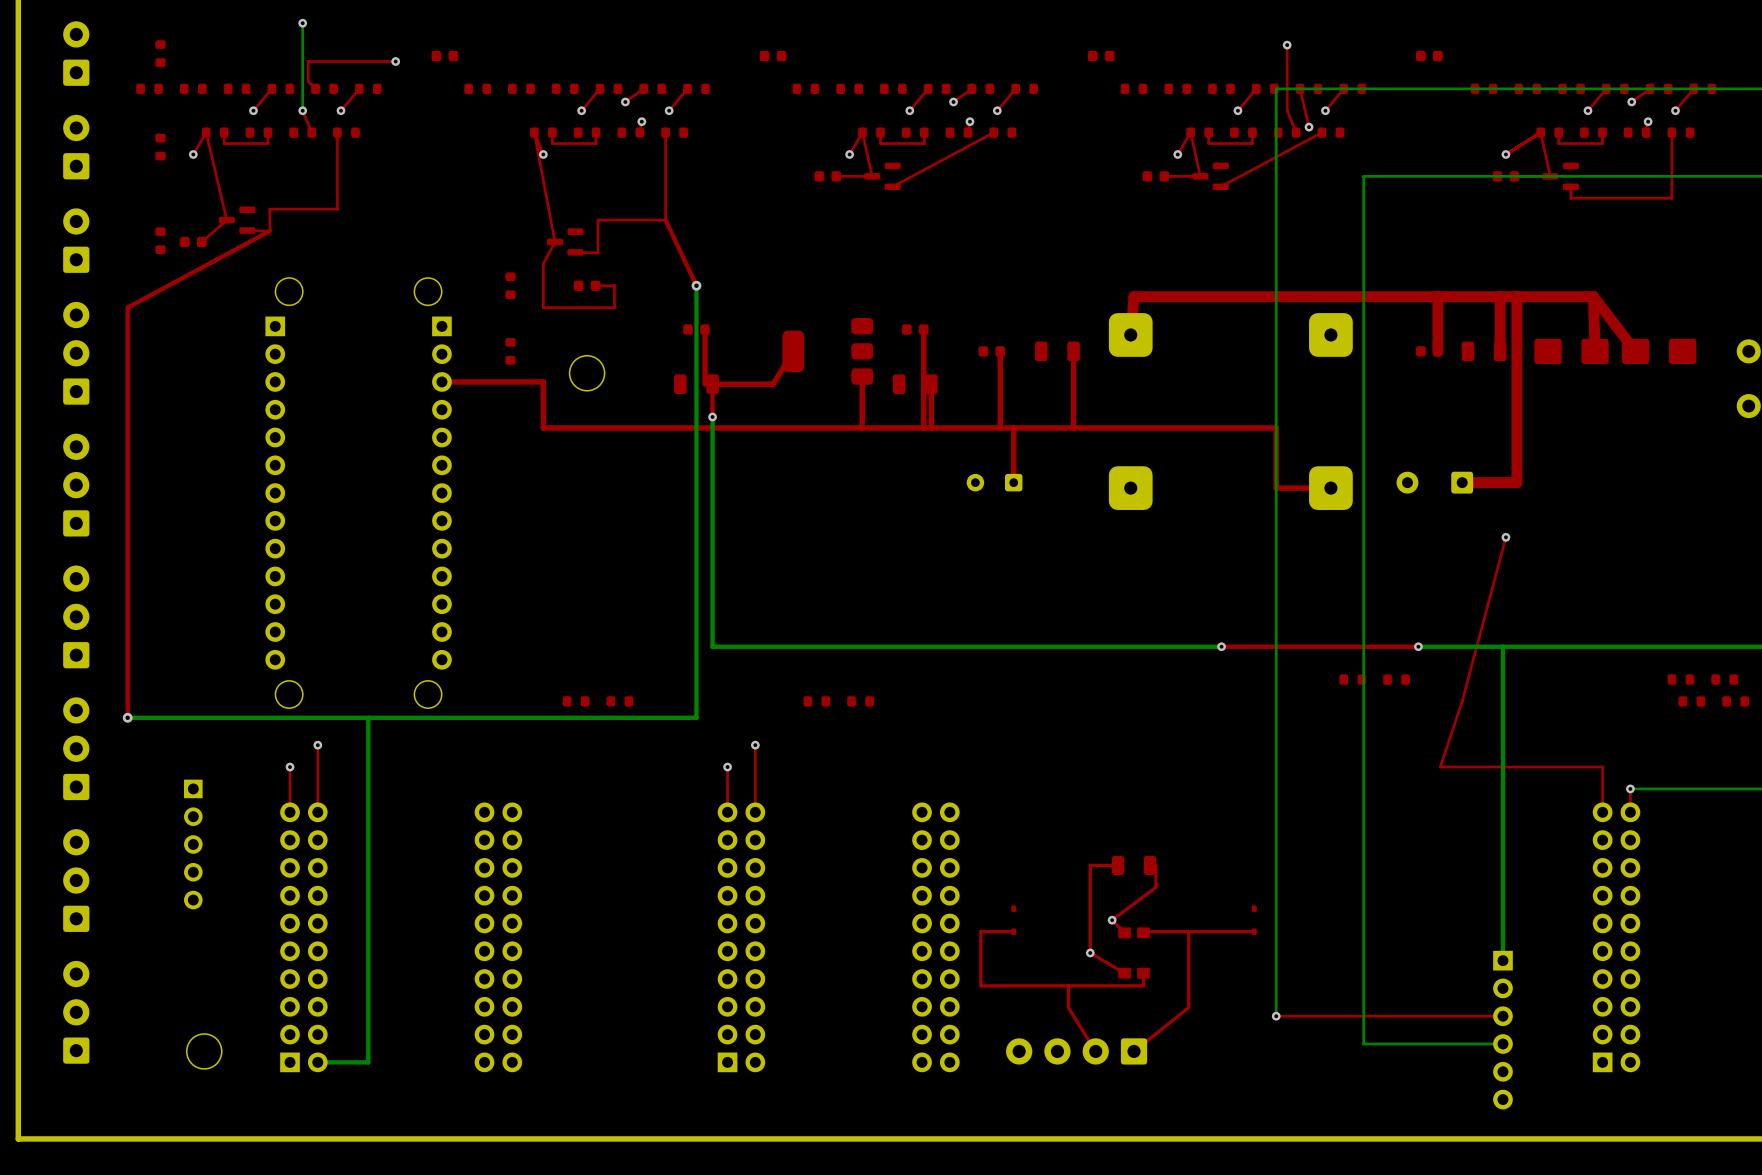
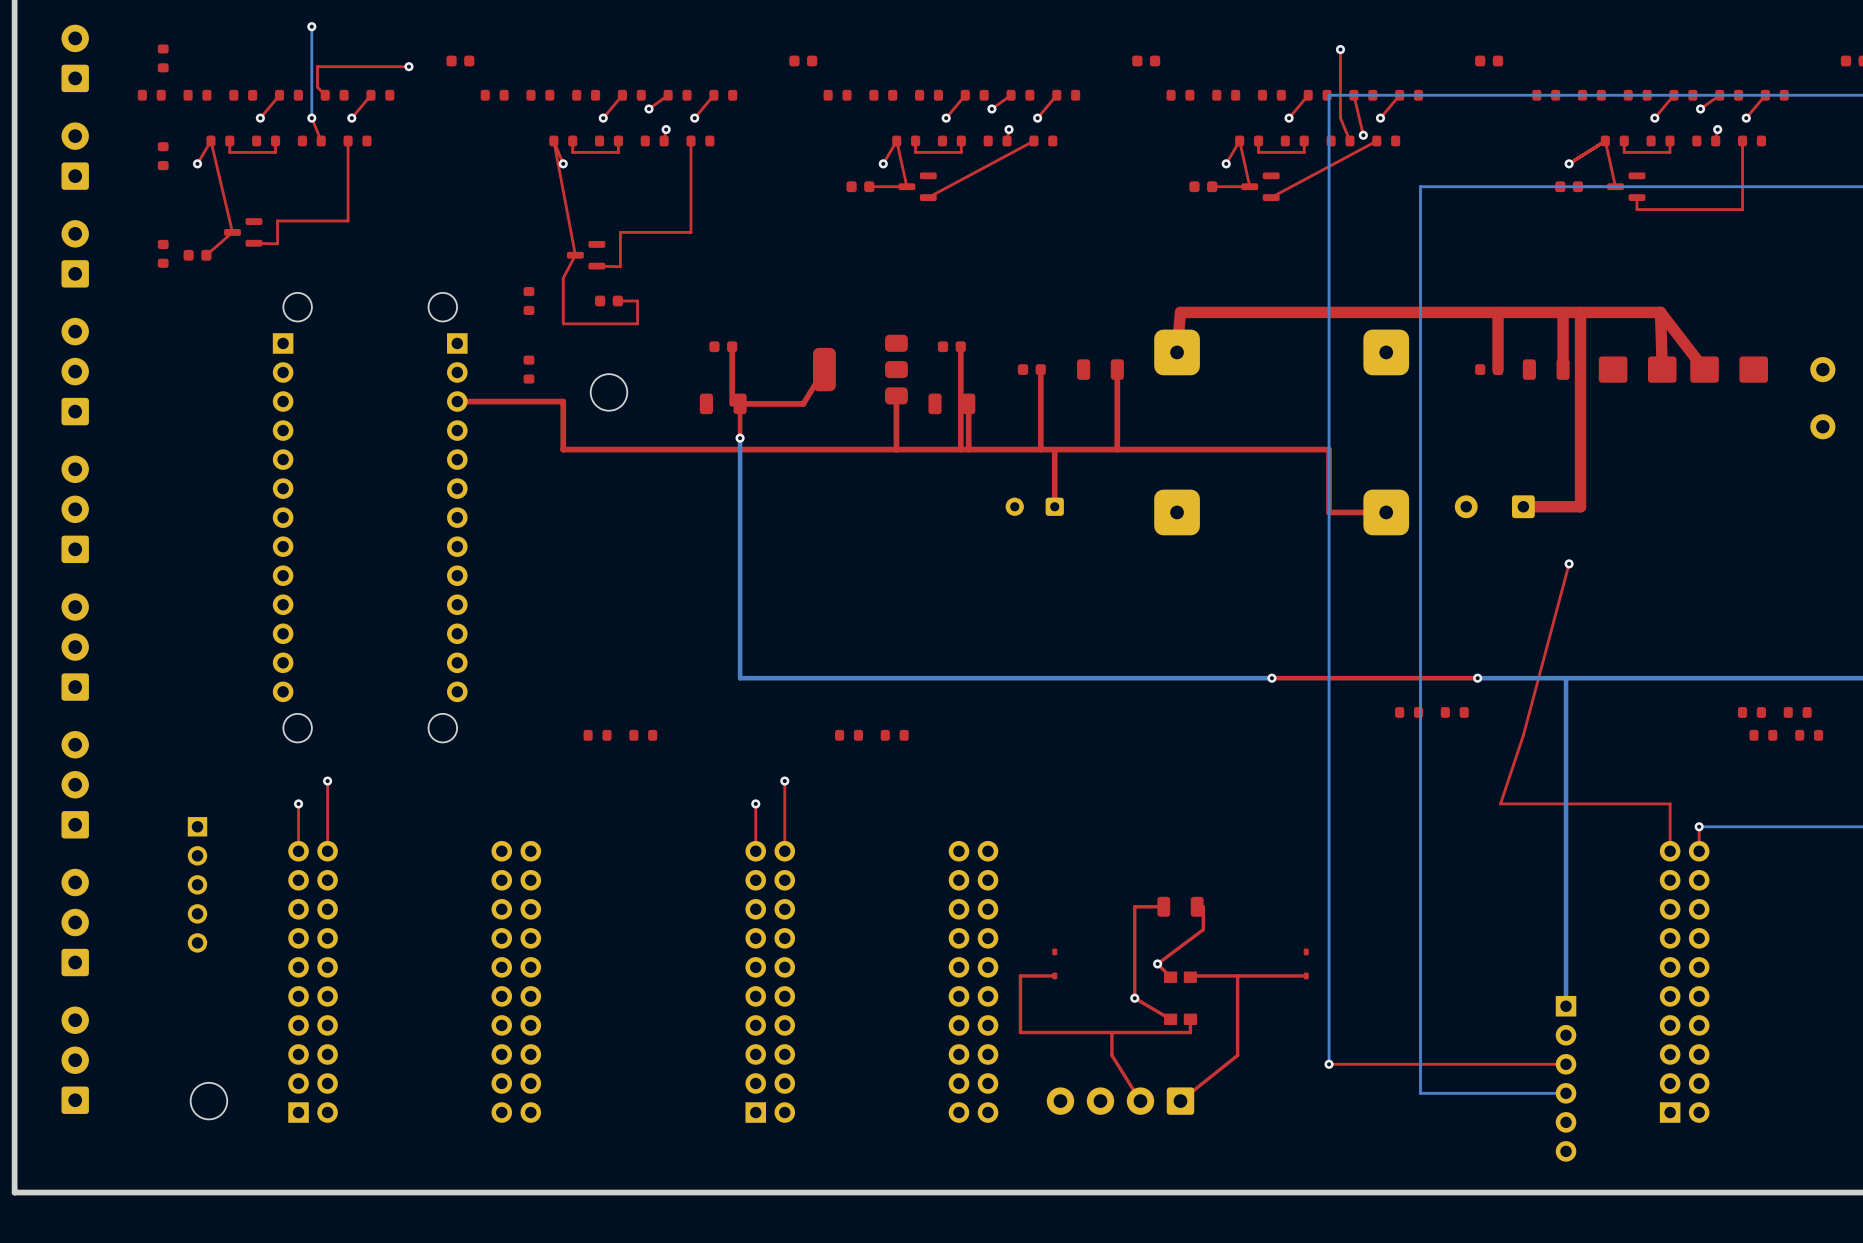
top track: (665, 220) (696, 285) -> none
top track: (269, 231) (127, 307) (127, 717) -> none
bottom track: (696, 285) (696, 717) (127, 717) -> none
via: (696, 285) -> none
via: (127, 717) -> none
bottom track: (368, 717) (368, 1062) (317, 1062) -> none

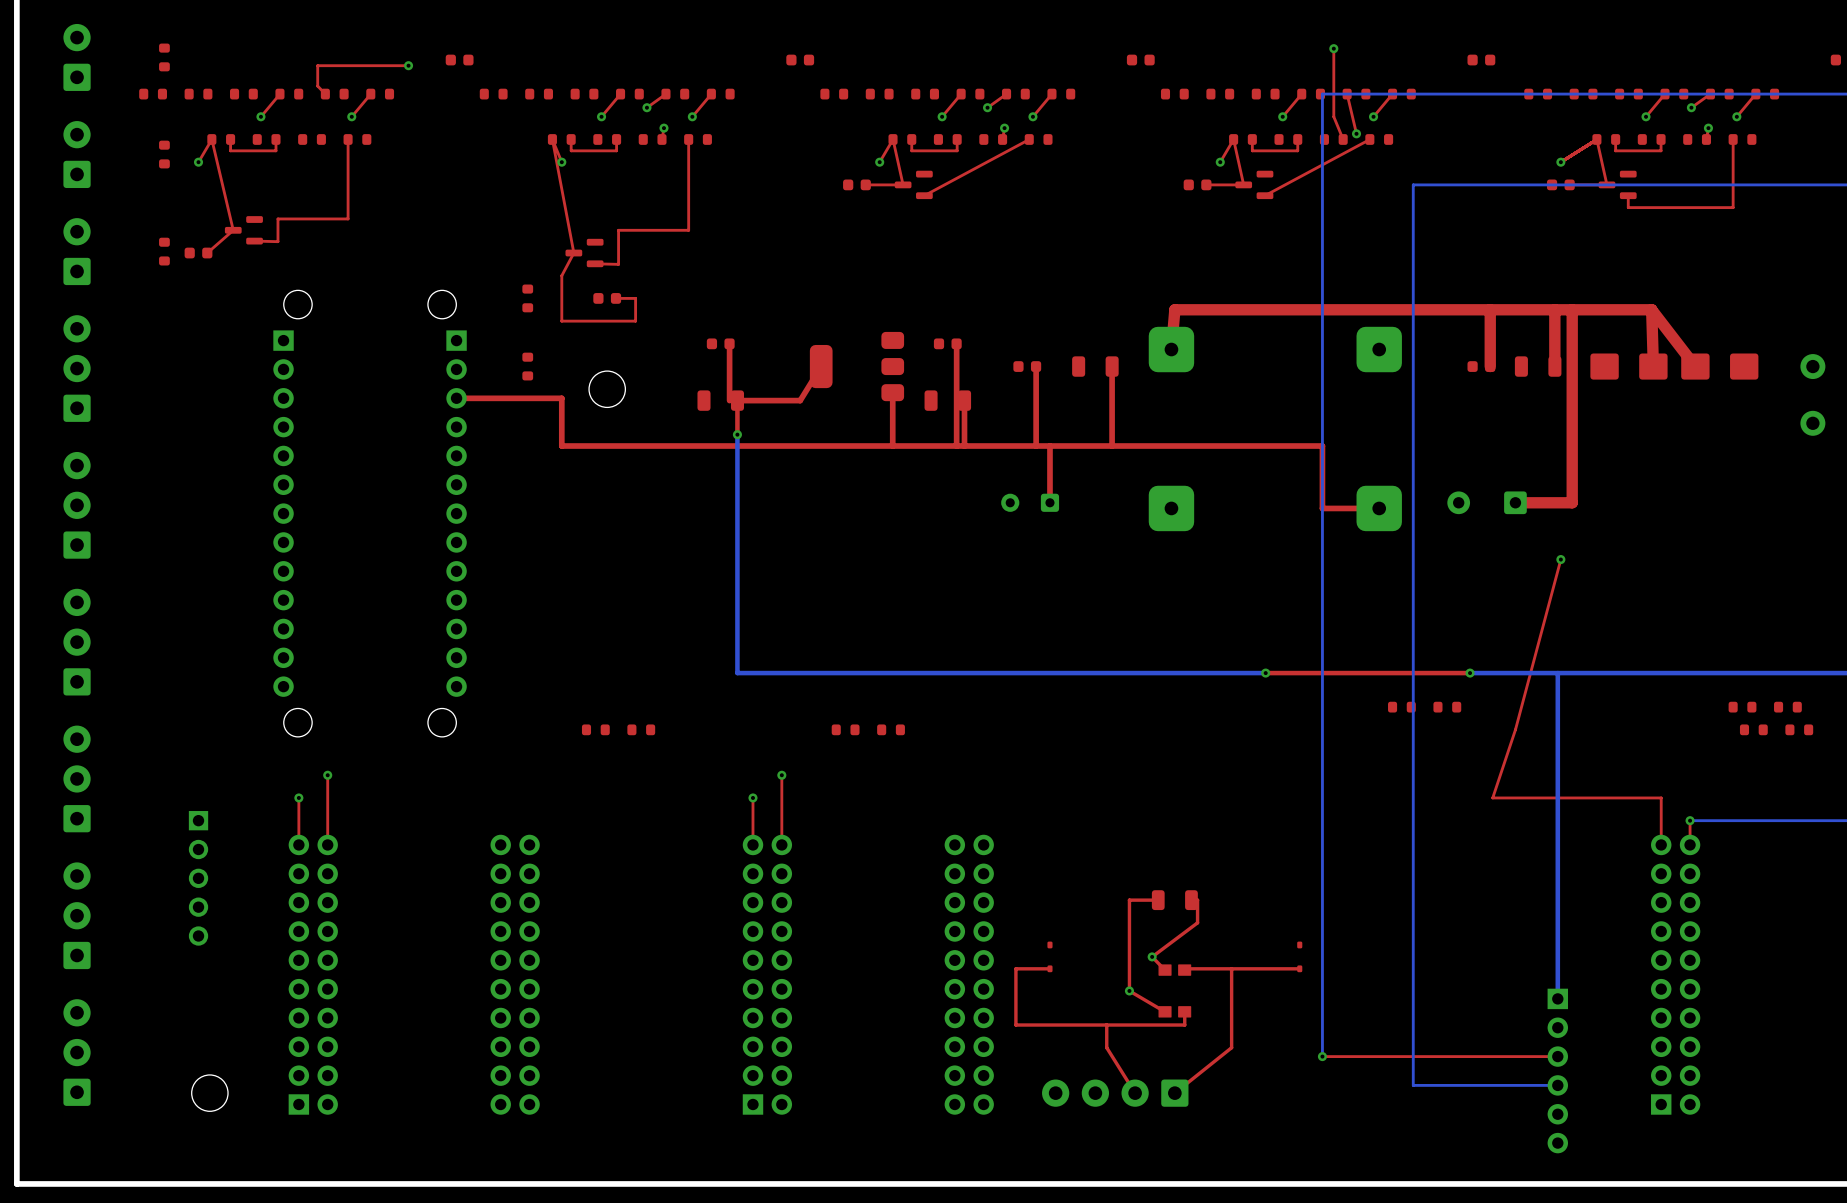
bottom track: (311, 26) (311, 118) -> none
via: (311, 26) -> none
top track: (311, 118) (321, 140) -> none
via: (311, 118) -> none

